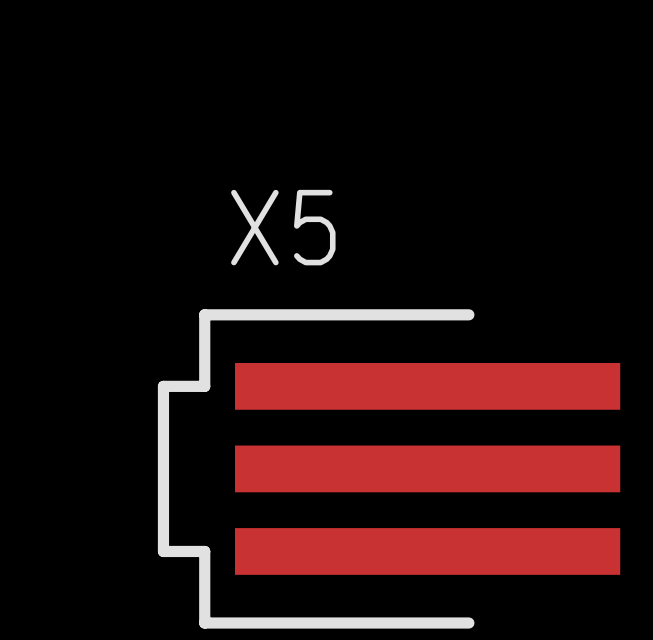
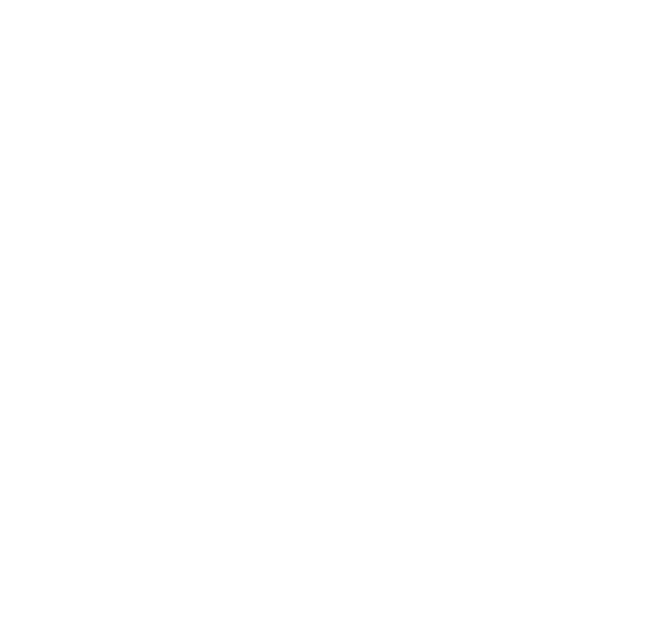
X5: (389, 468) -> none

